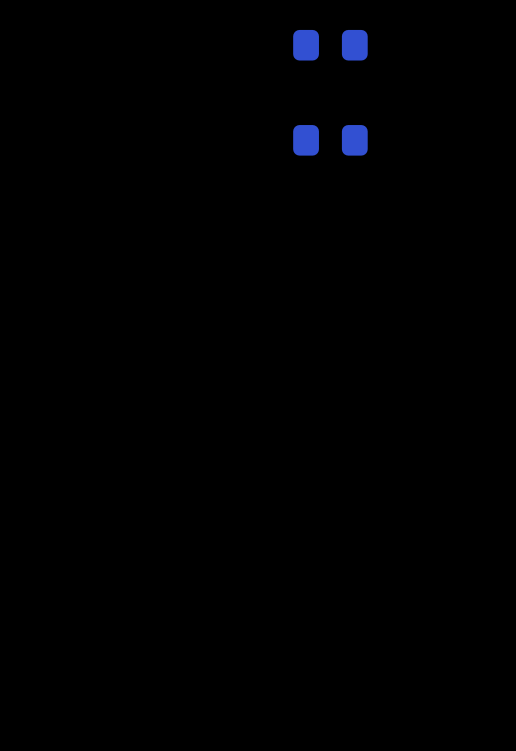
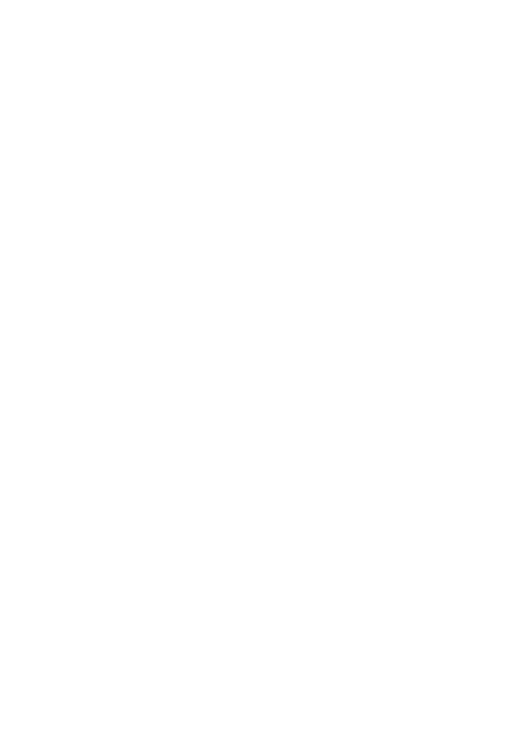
part: (330, 45) -> none
part: (330, 140) -> none

